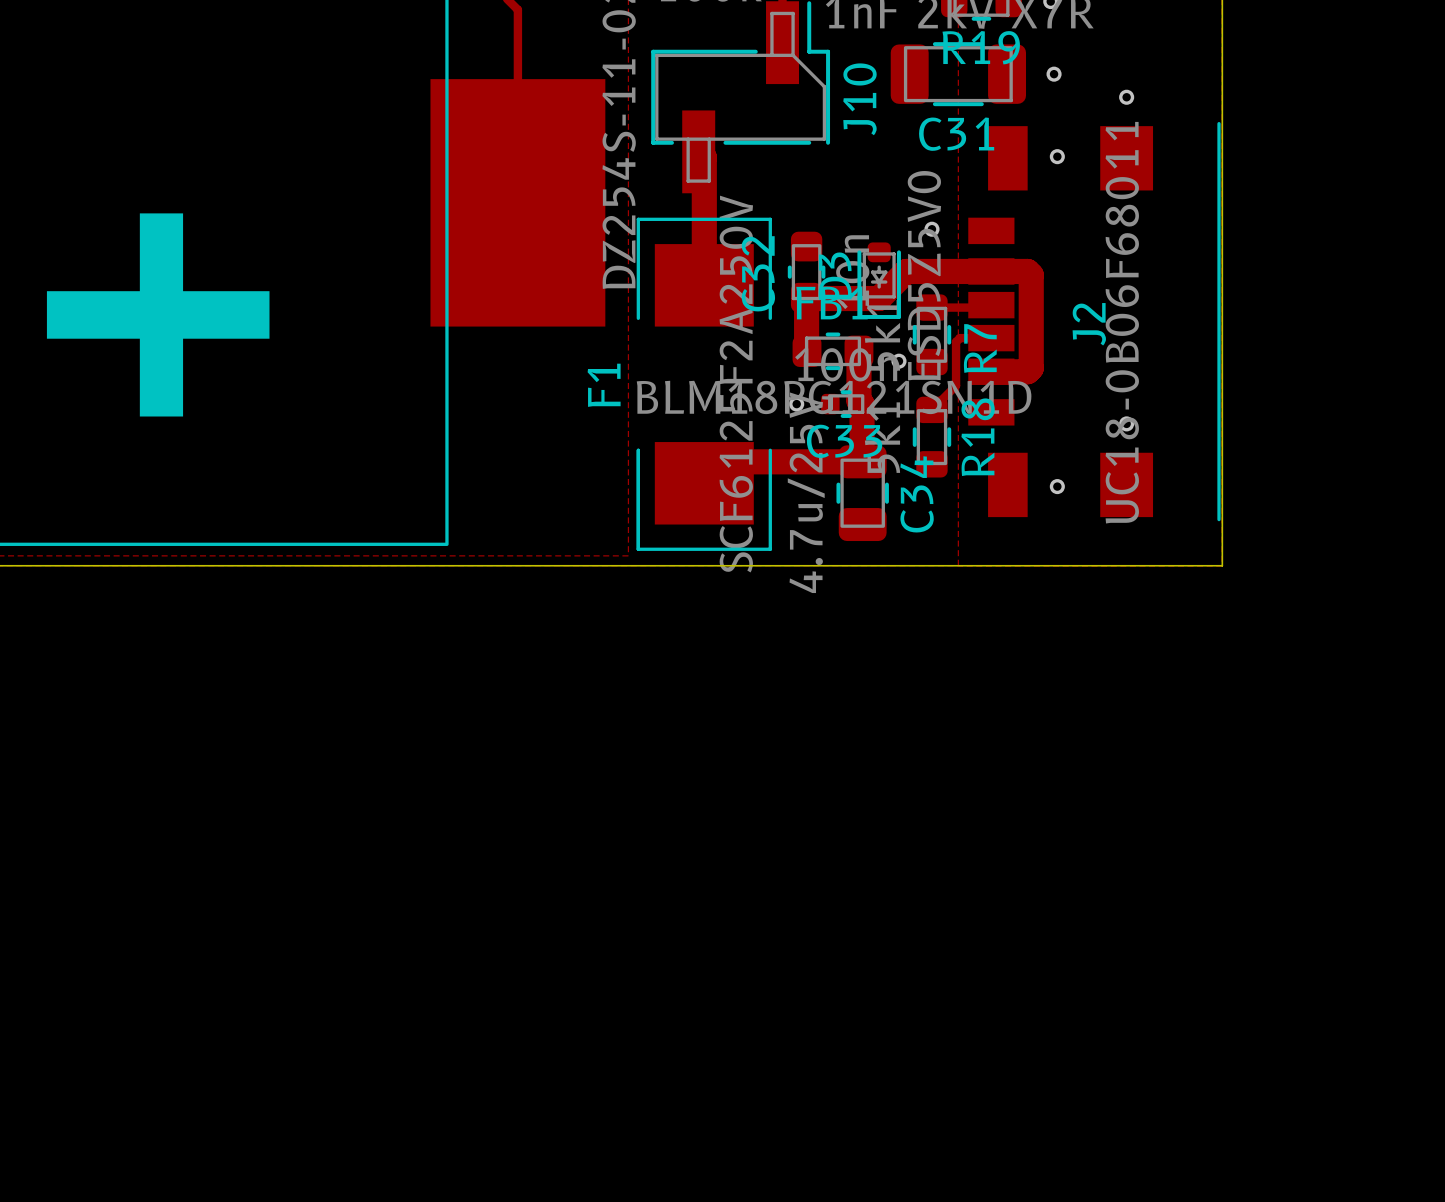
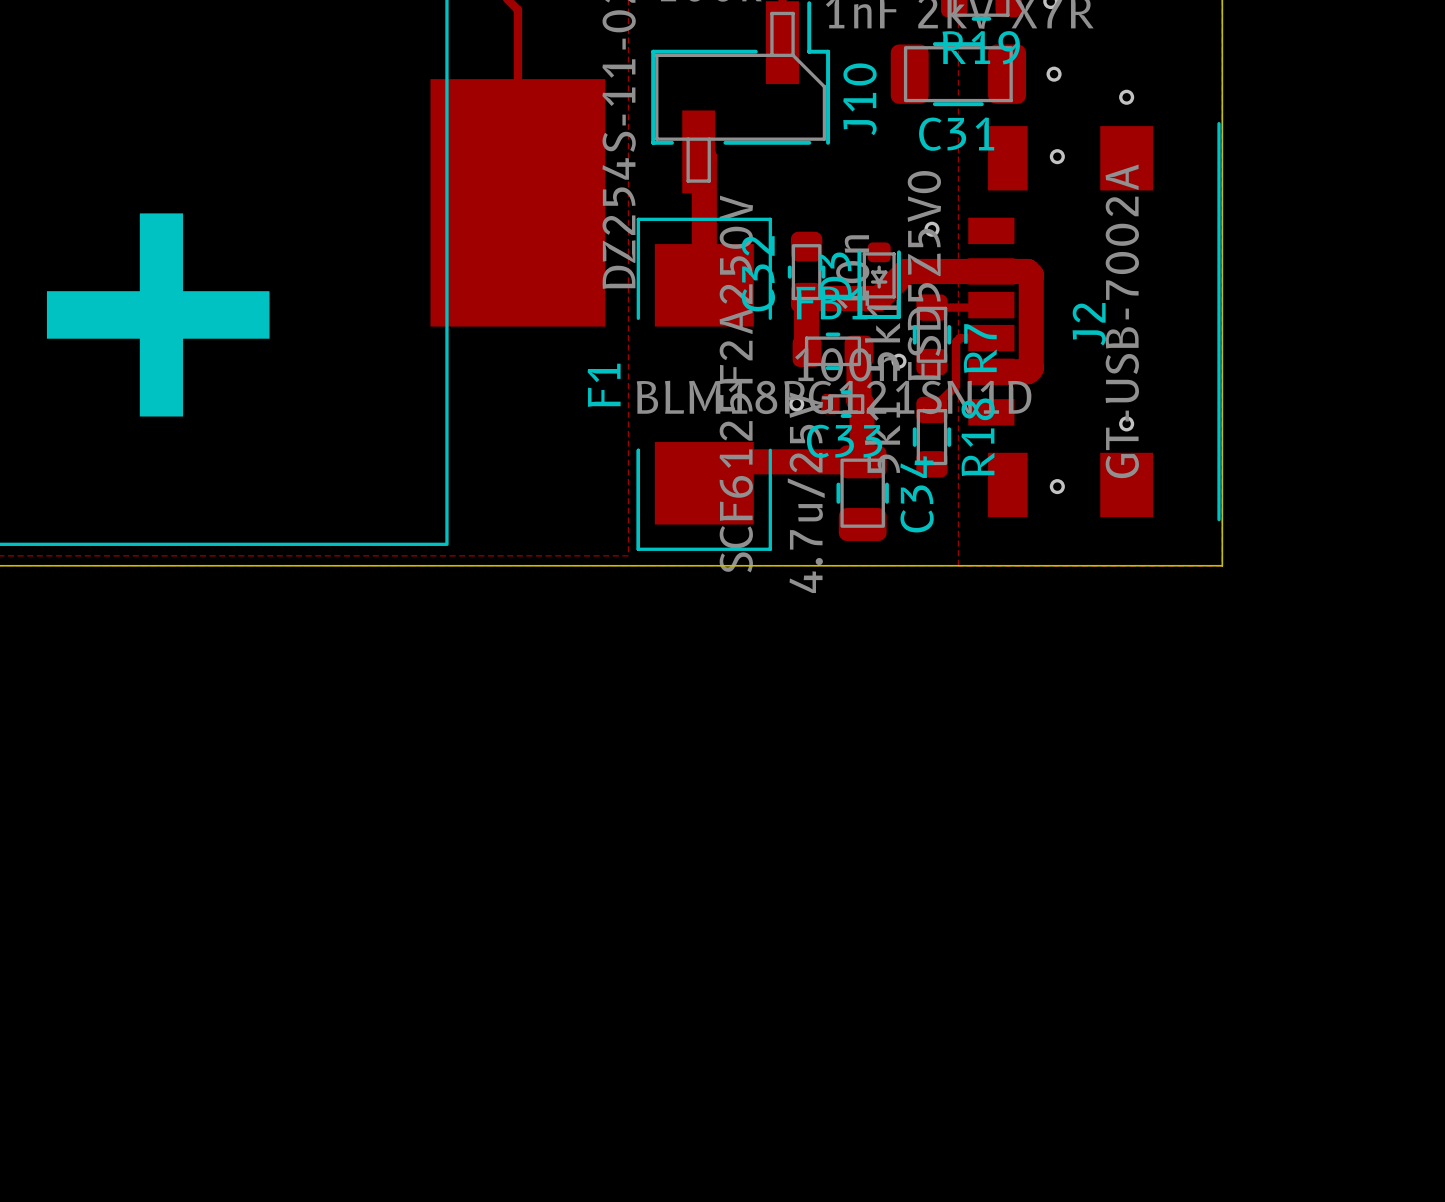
J2 value: UC18-0B06F68011 (1122, 322) -> GT-USB-7002A (1122, 321)

